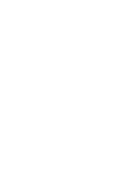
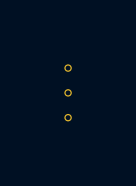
part: none -> (68, 92)

